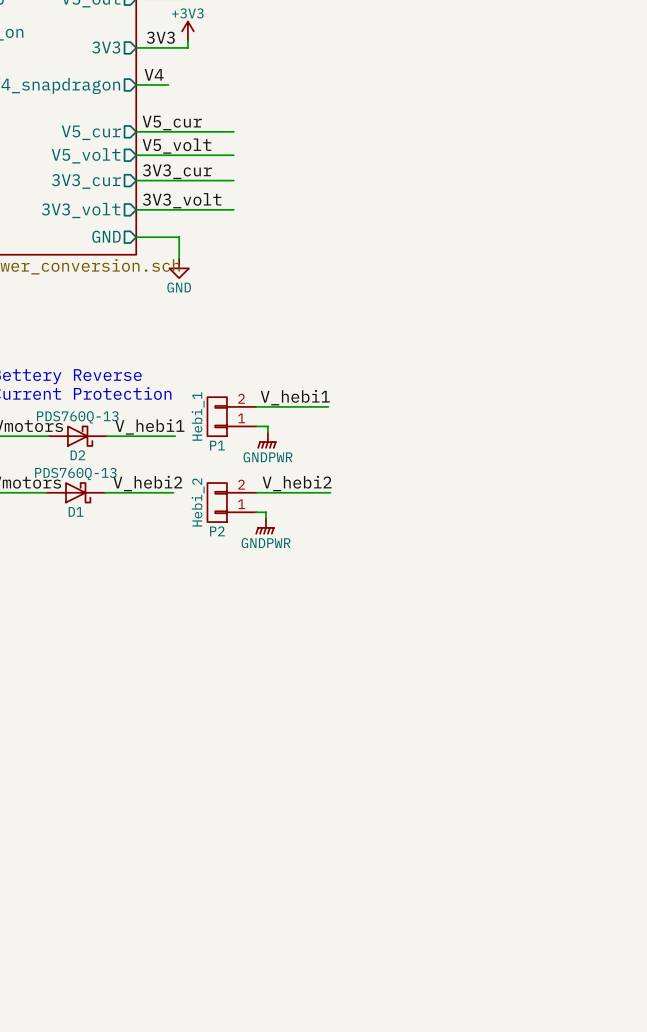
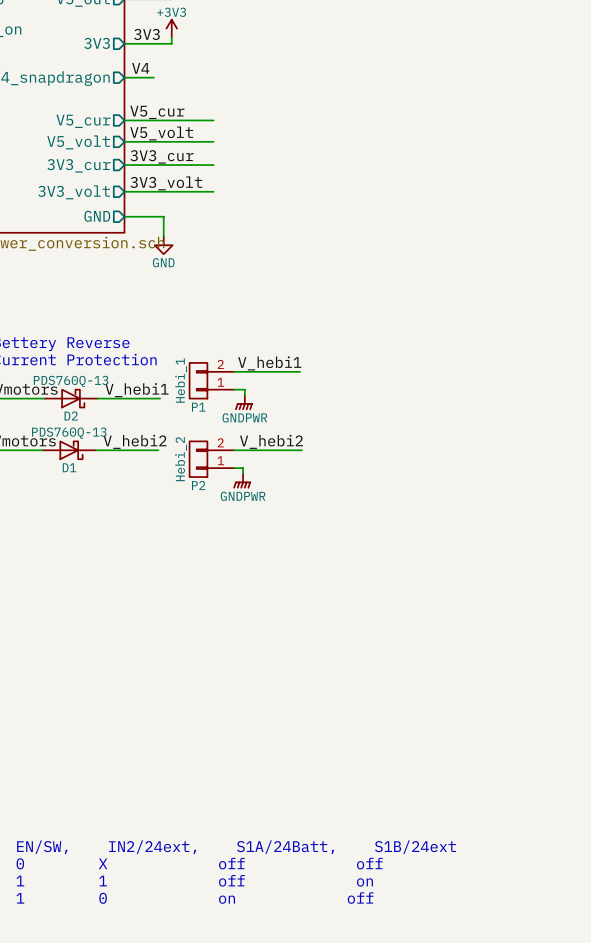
text: none -> EN/SW, IN2/24ext, S1A/24Batt, S1B/24ext (236, 847)
text: none -> 0 X off off (199, 863)
text: none -> 1 1 off on (194, 880)
text: none -> 1 0 on off (195, 898)

